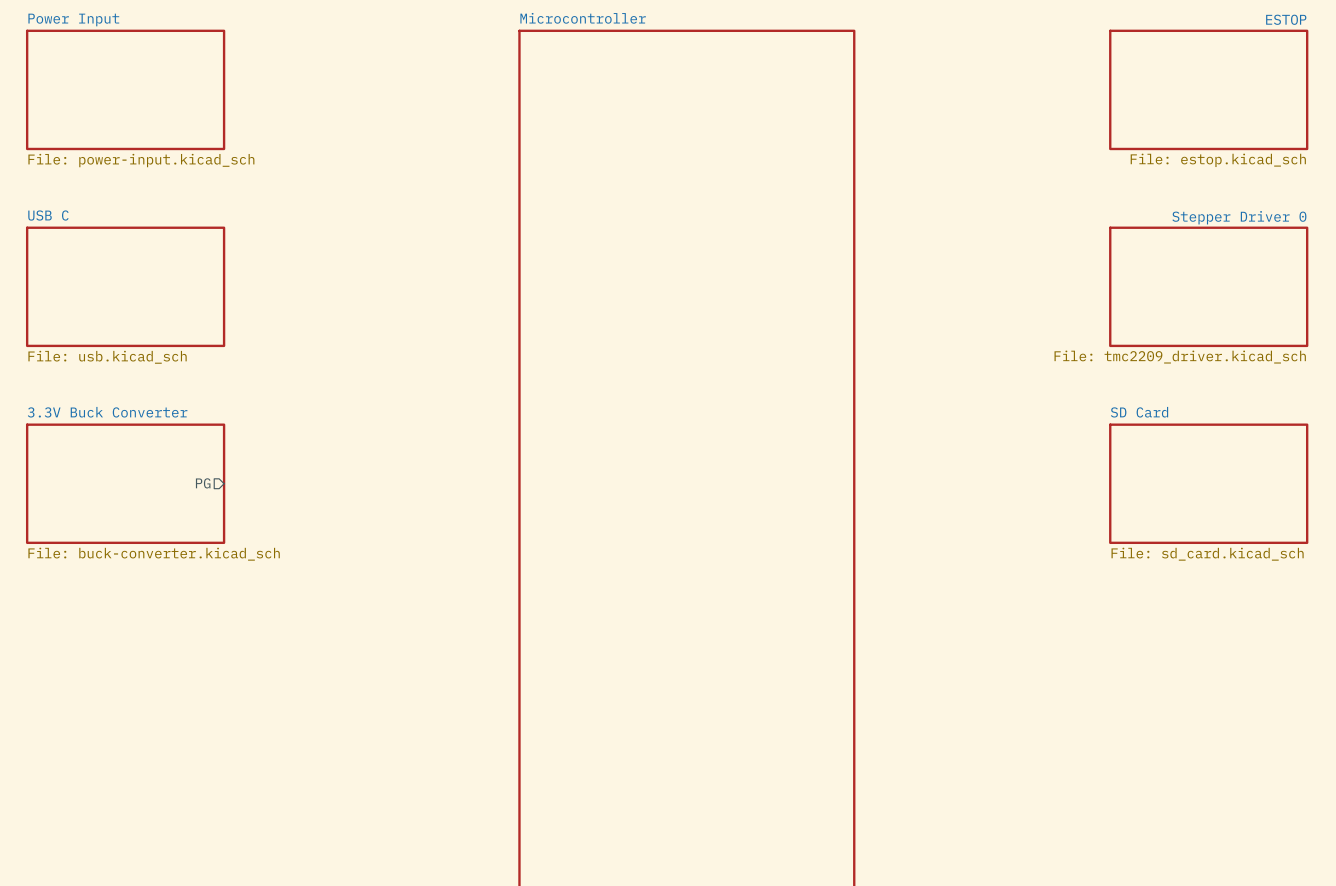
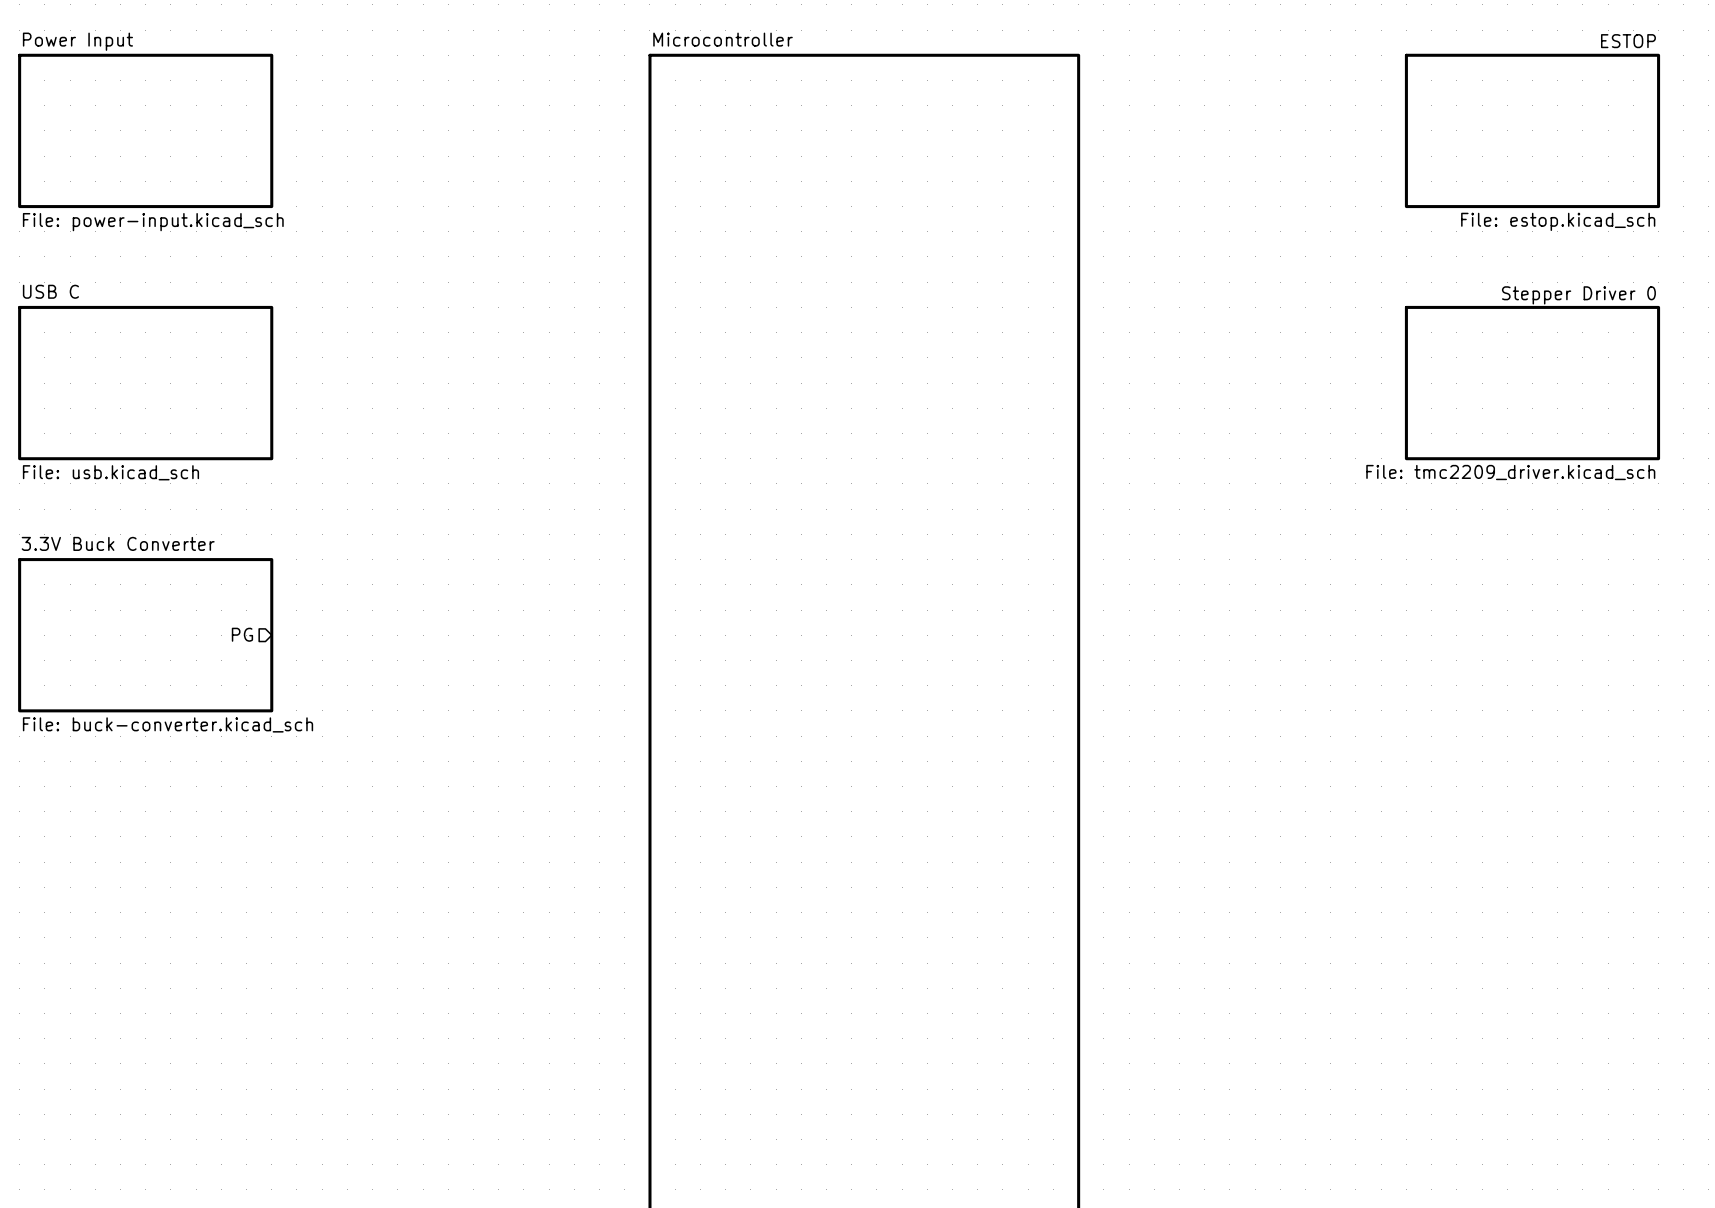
sheet SD Card: File: sd_card.kicad_sch (1208, 483) -> none

